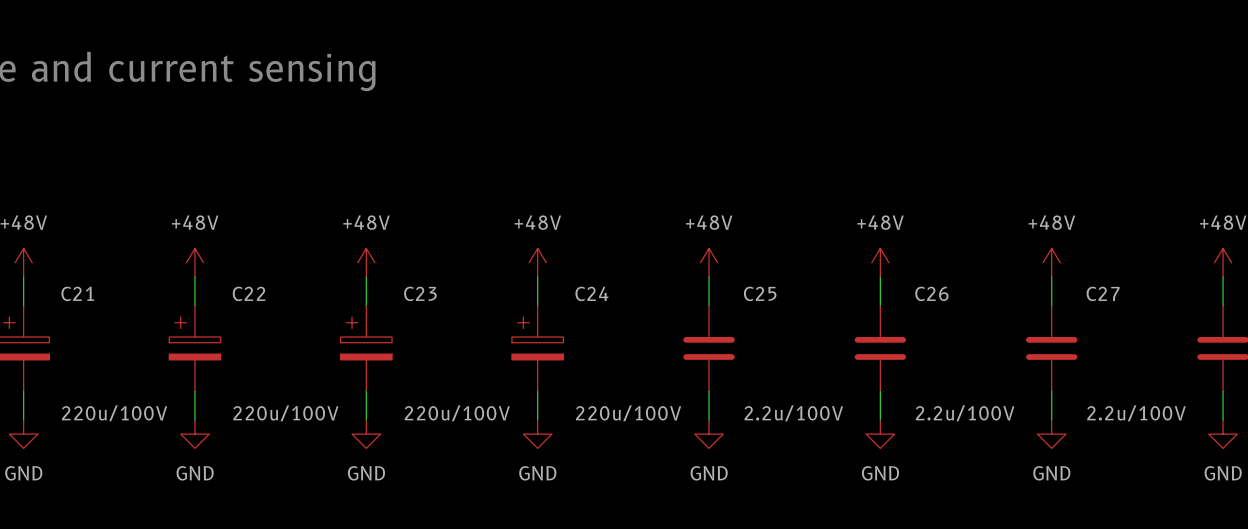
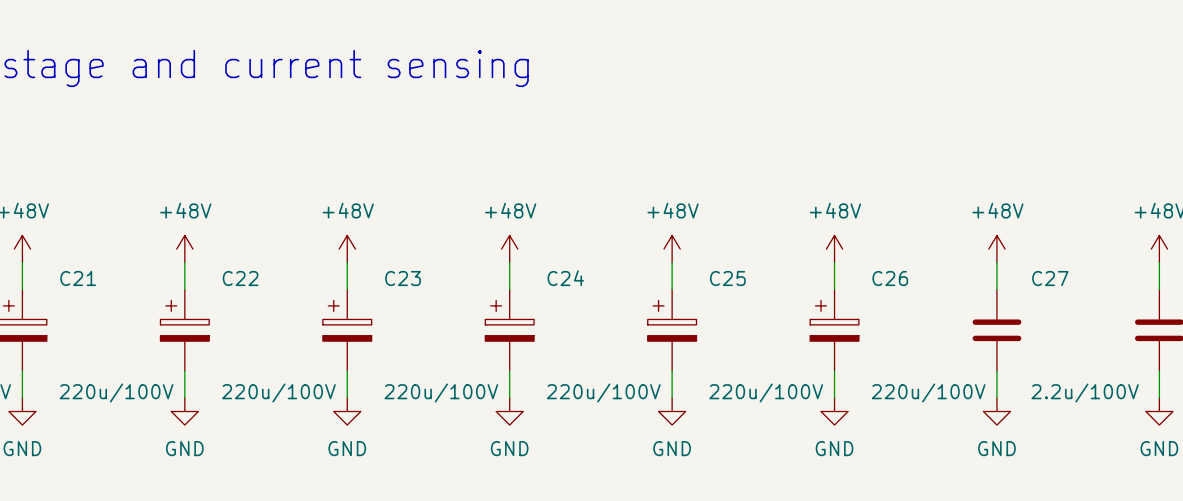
C25 symbol: [683, 305, 735, 392] -> [647, 289, 697, 371]
C26 symbol: [854, 305, 907, 392] -> [810, 289, 859, 371]
C25 value: 2.2u/100V (793, 413) -> 220u/100V (766, 392)
C26 value: 2.2u/100V (965, 413) -> 220u/100V (928, 392)

